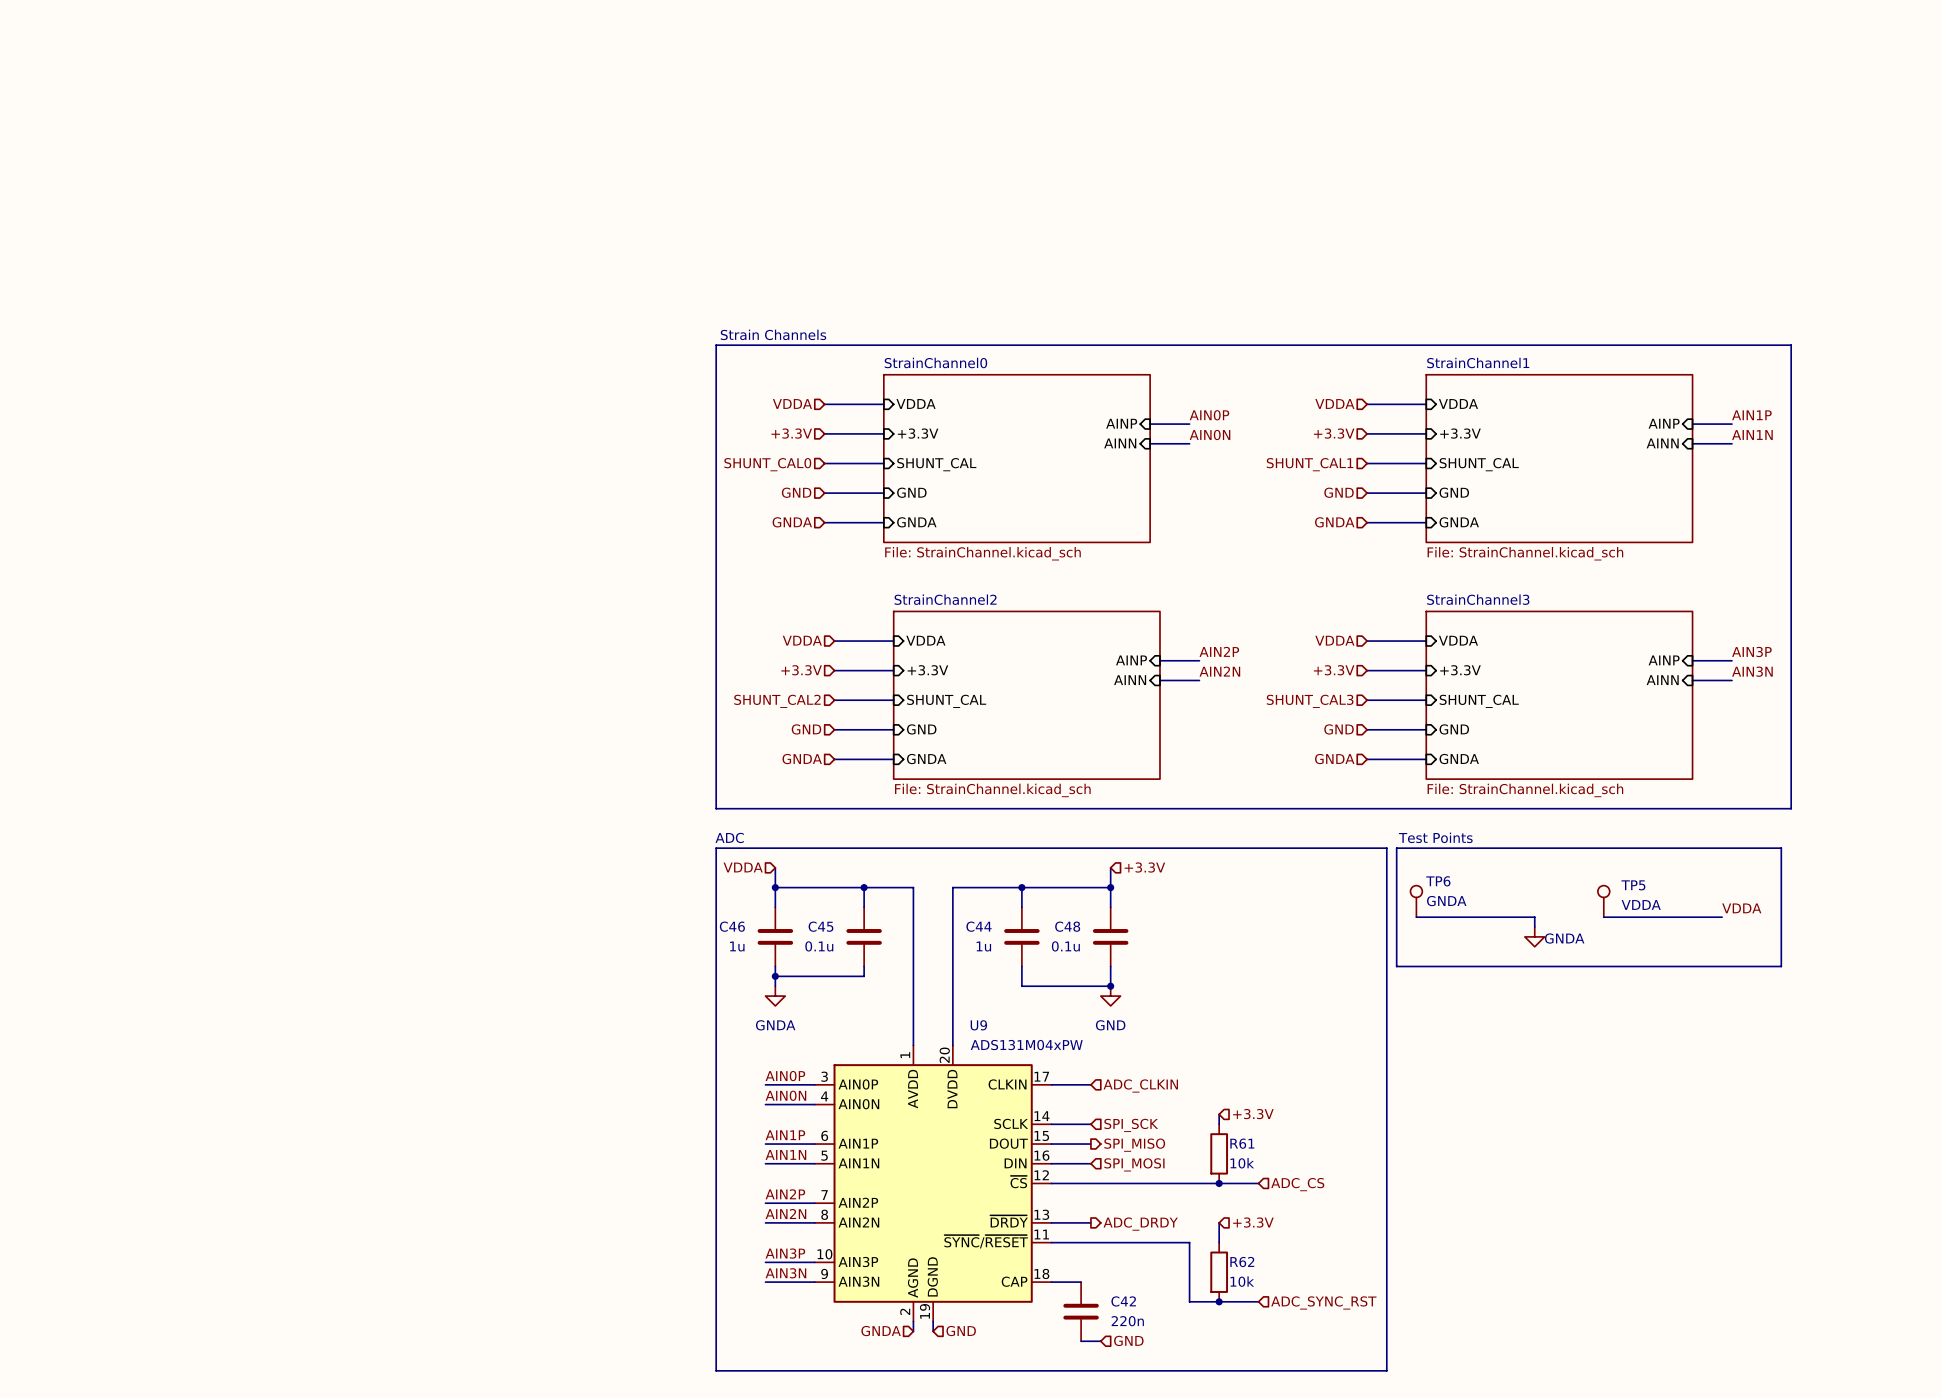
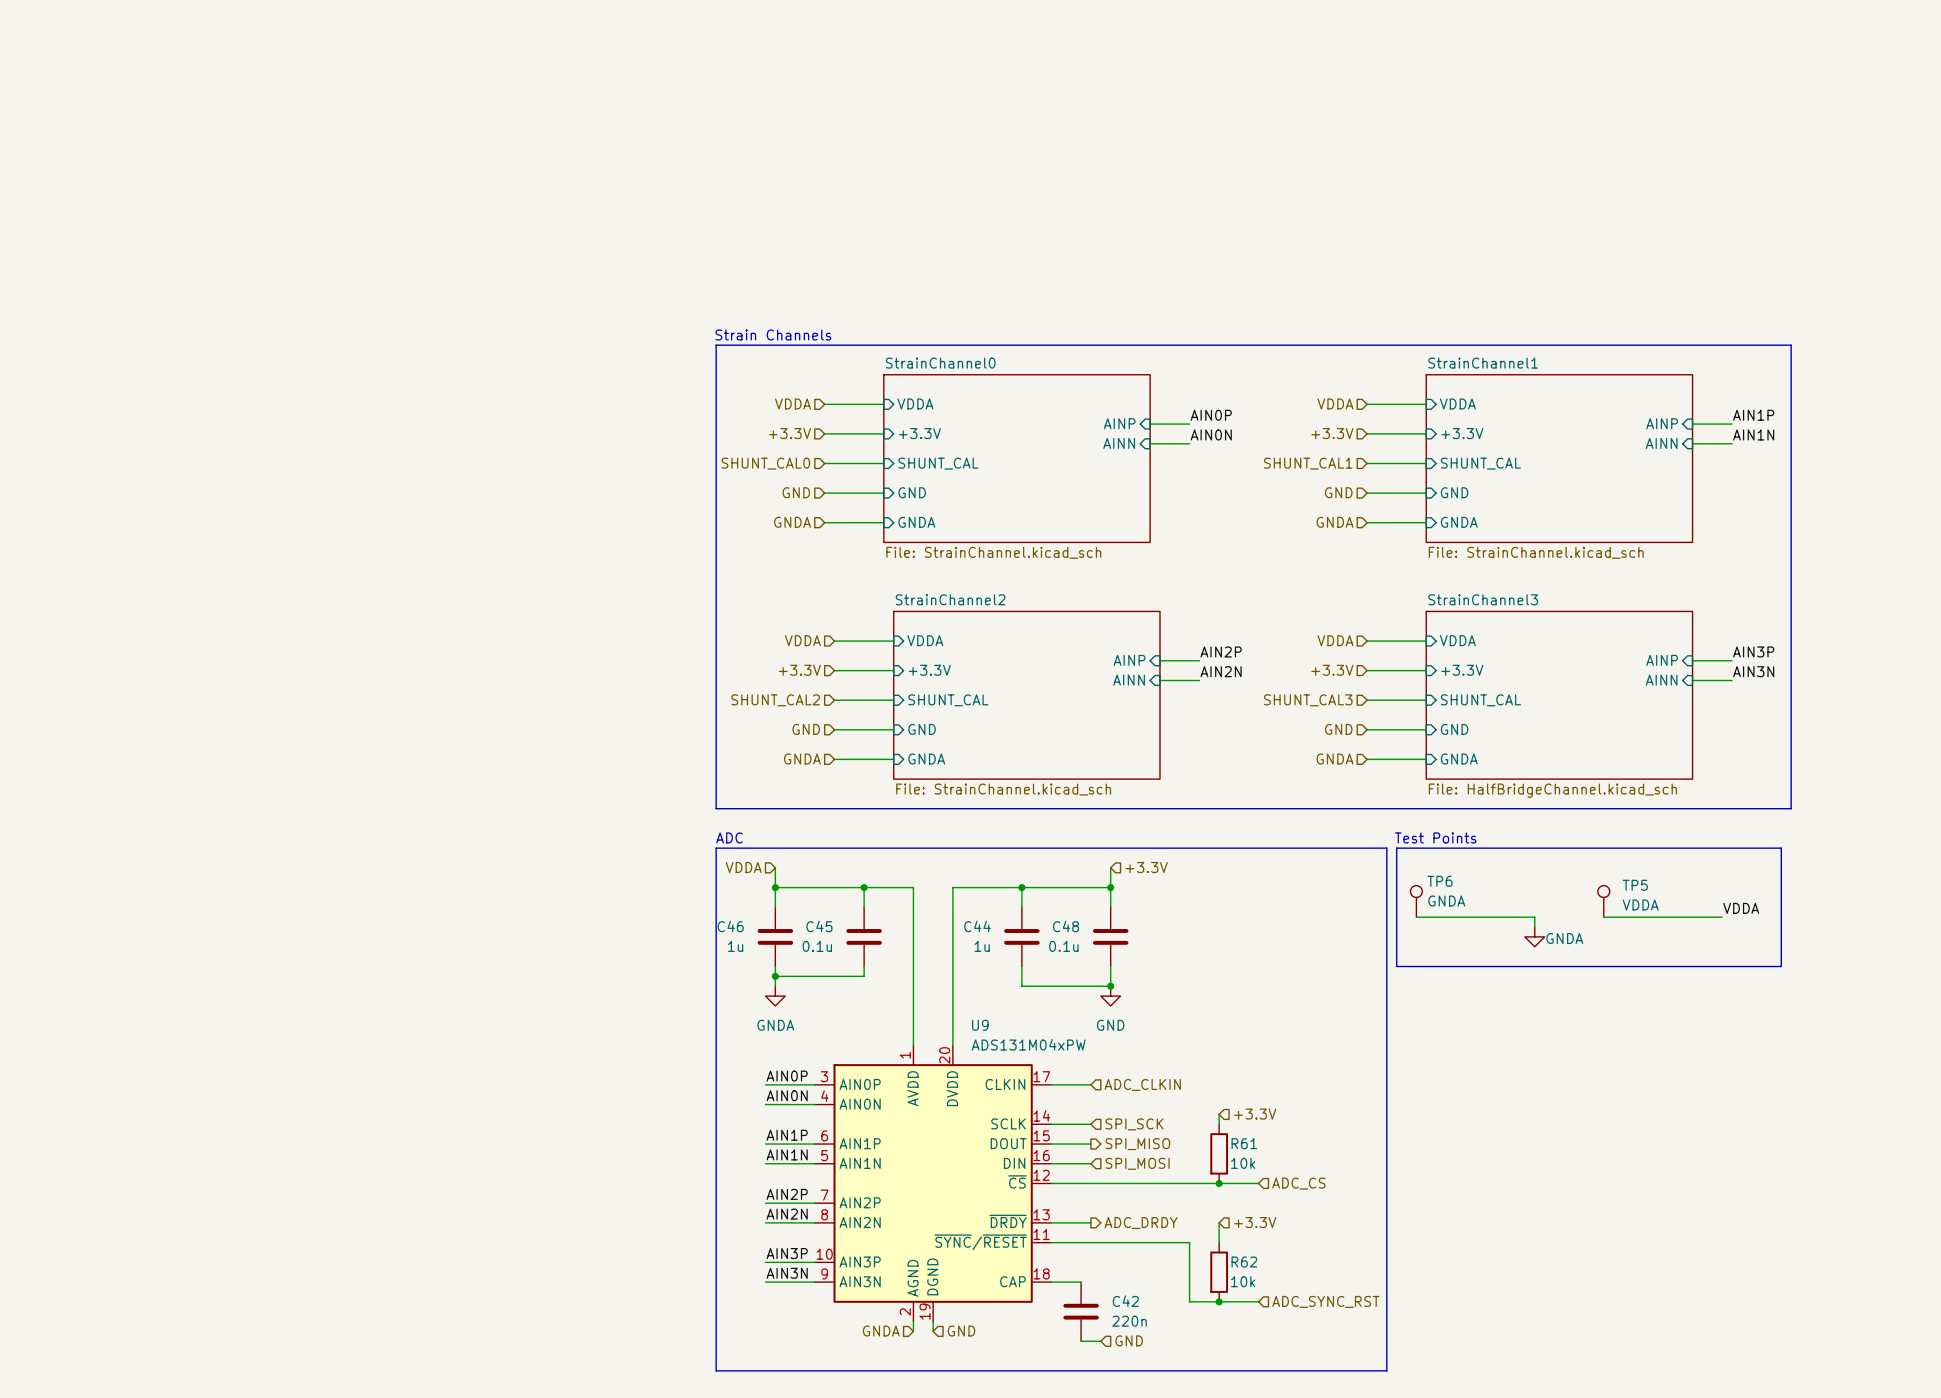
sheet StrainChannel3 value: File: StrainChannel.kicad_sch (1525, 790) -> File: HalfBridgeChannel.kicad_sch (1552, 790)

